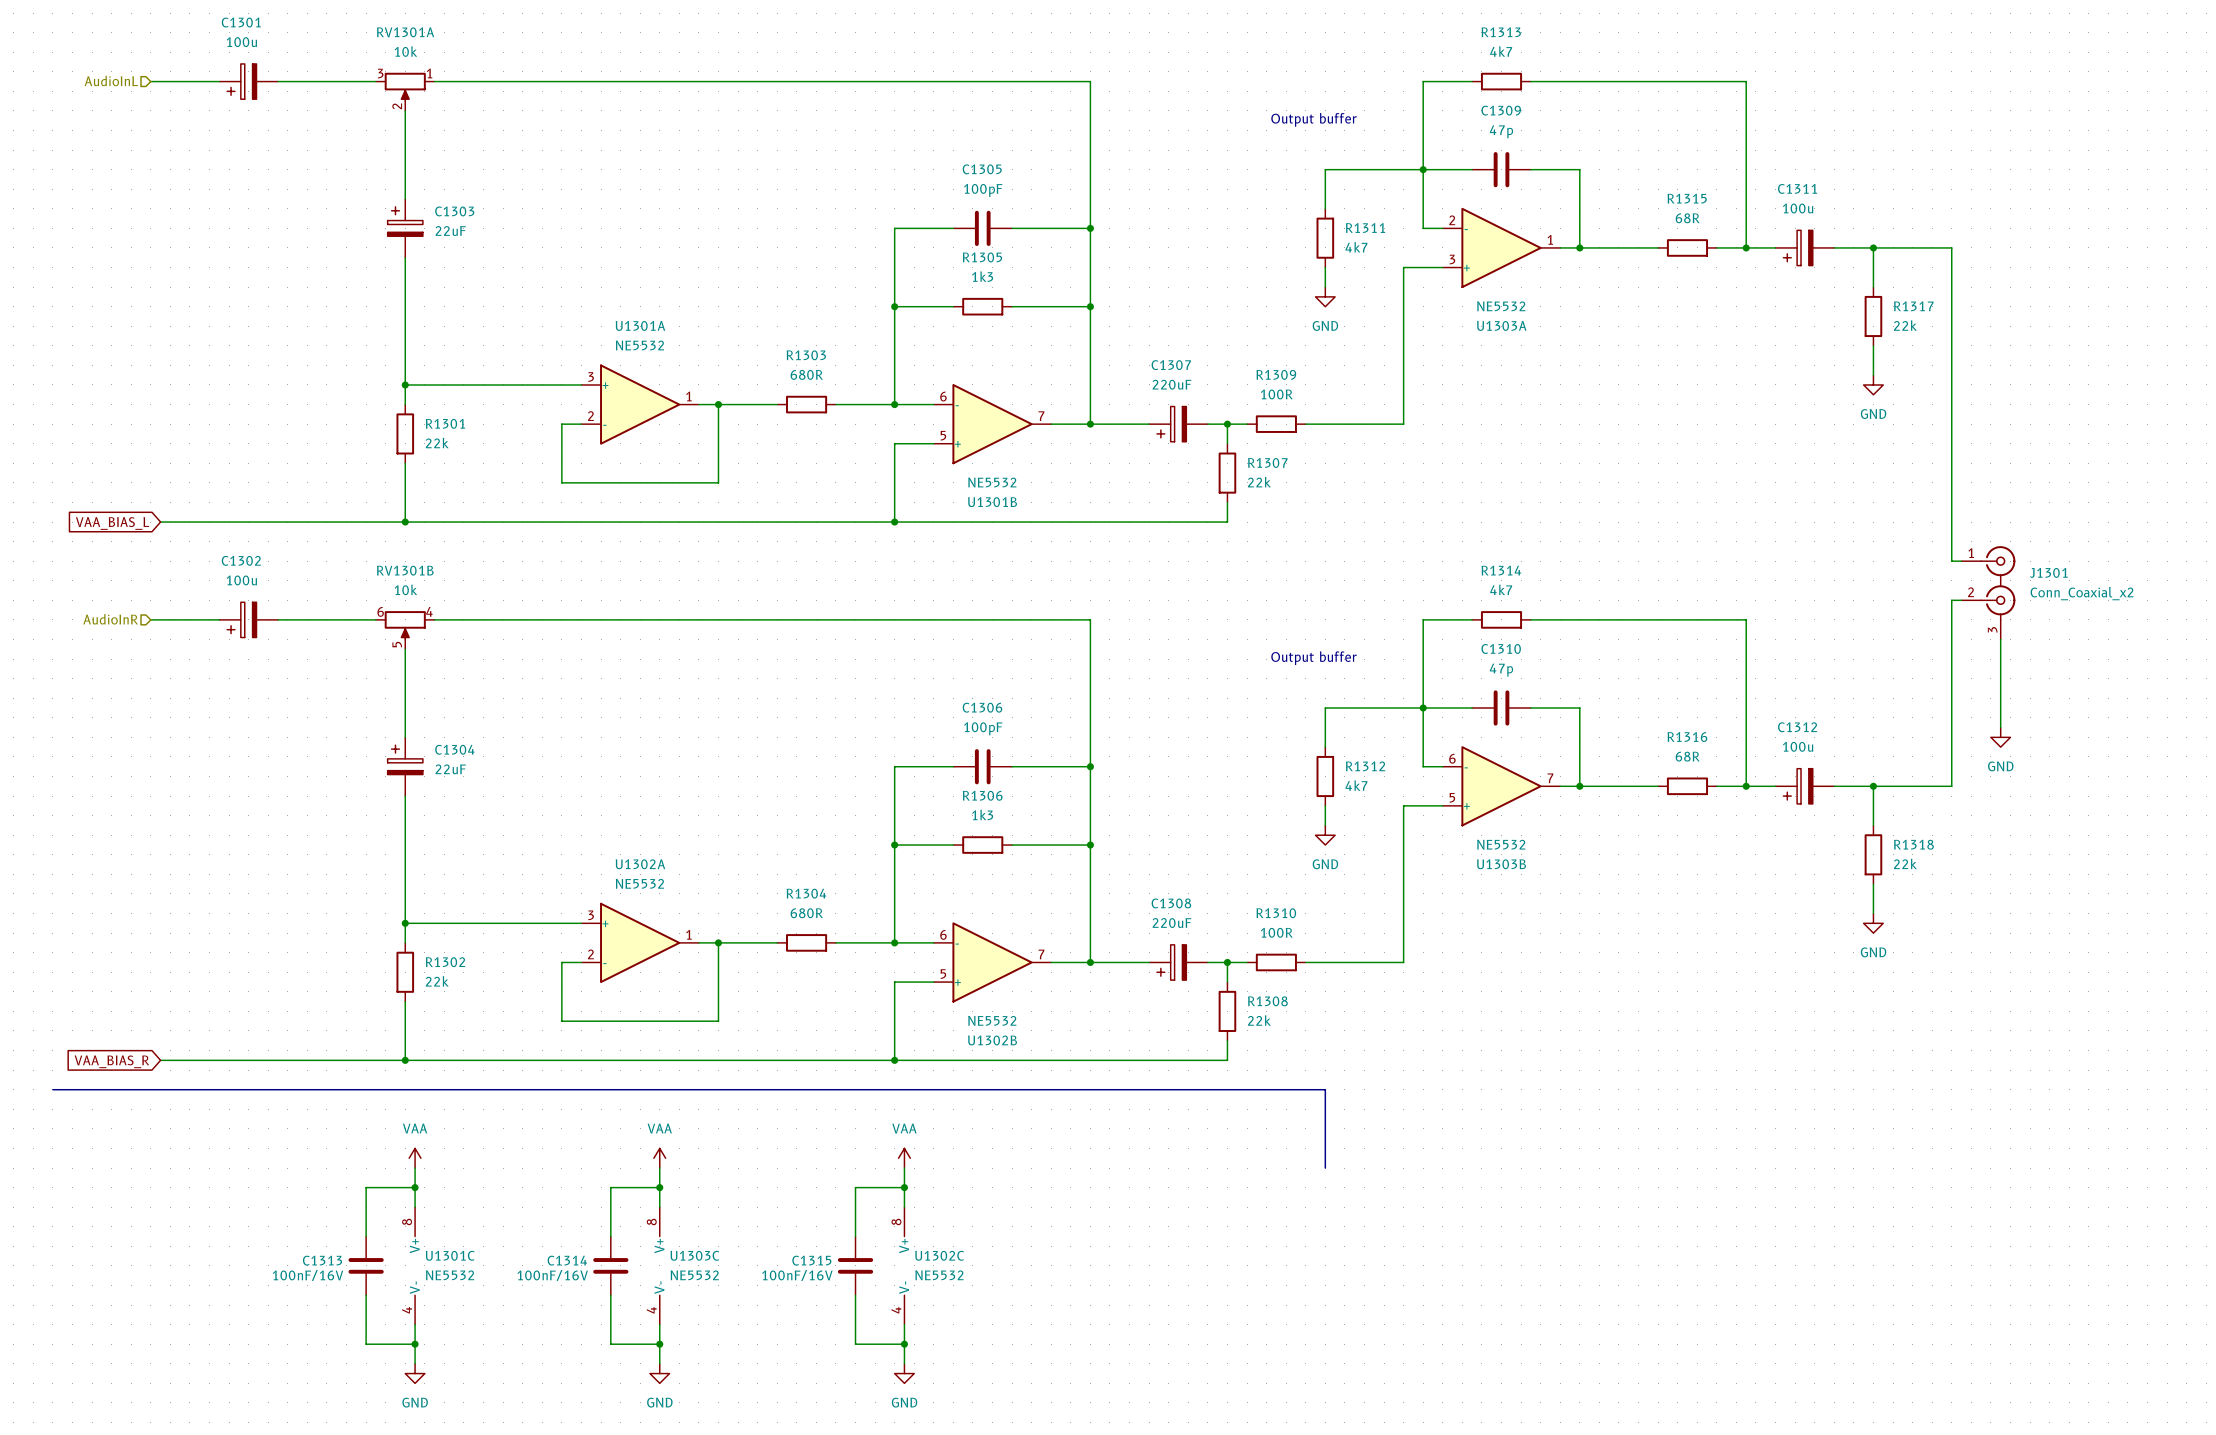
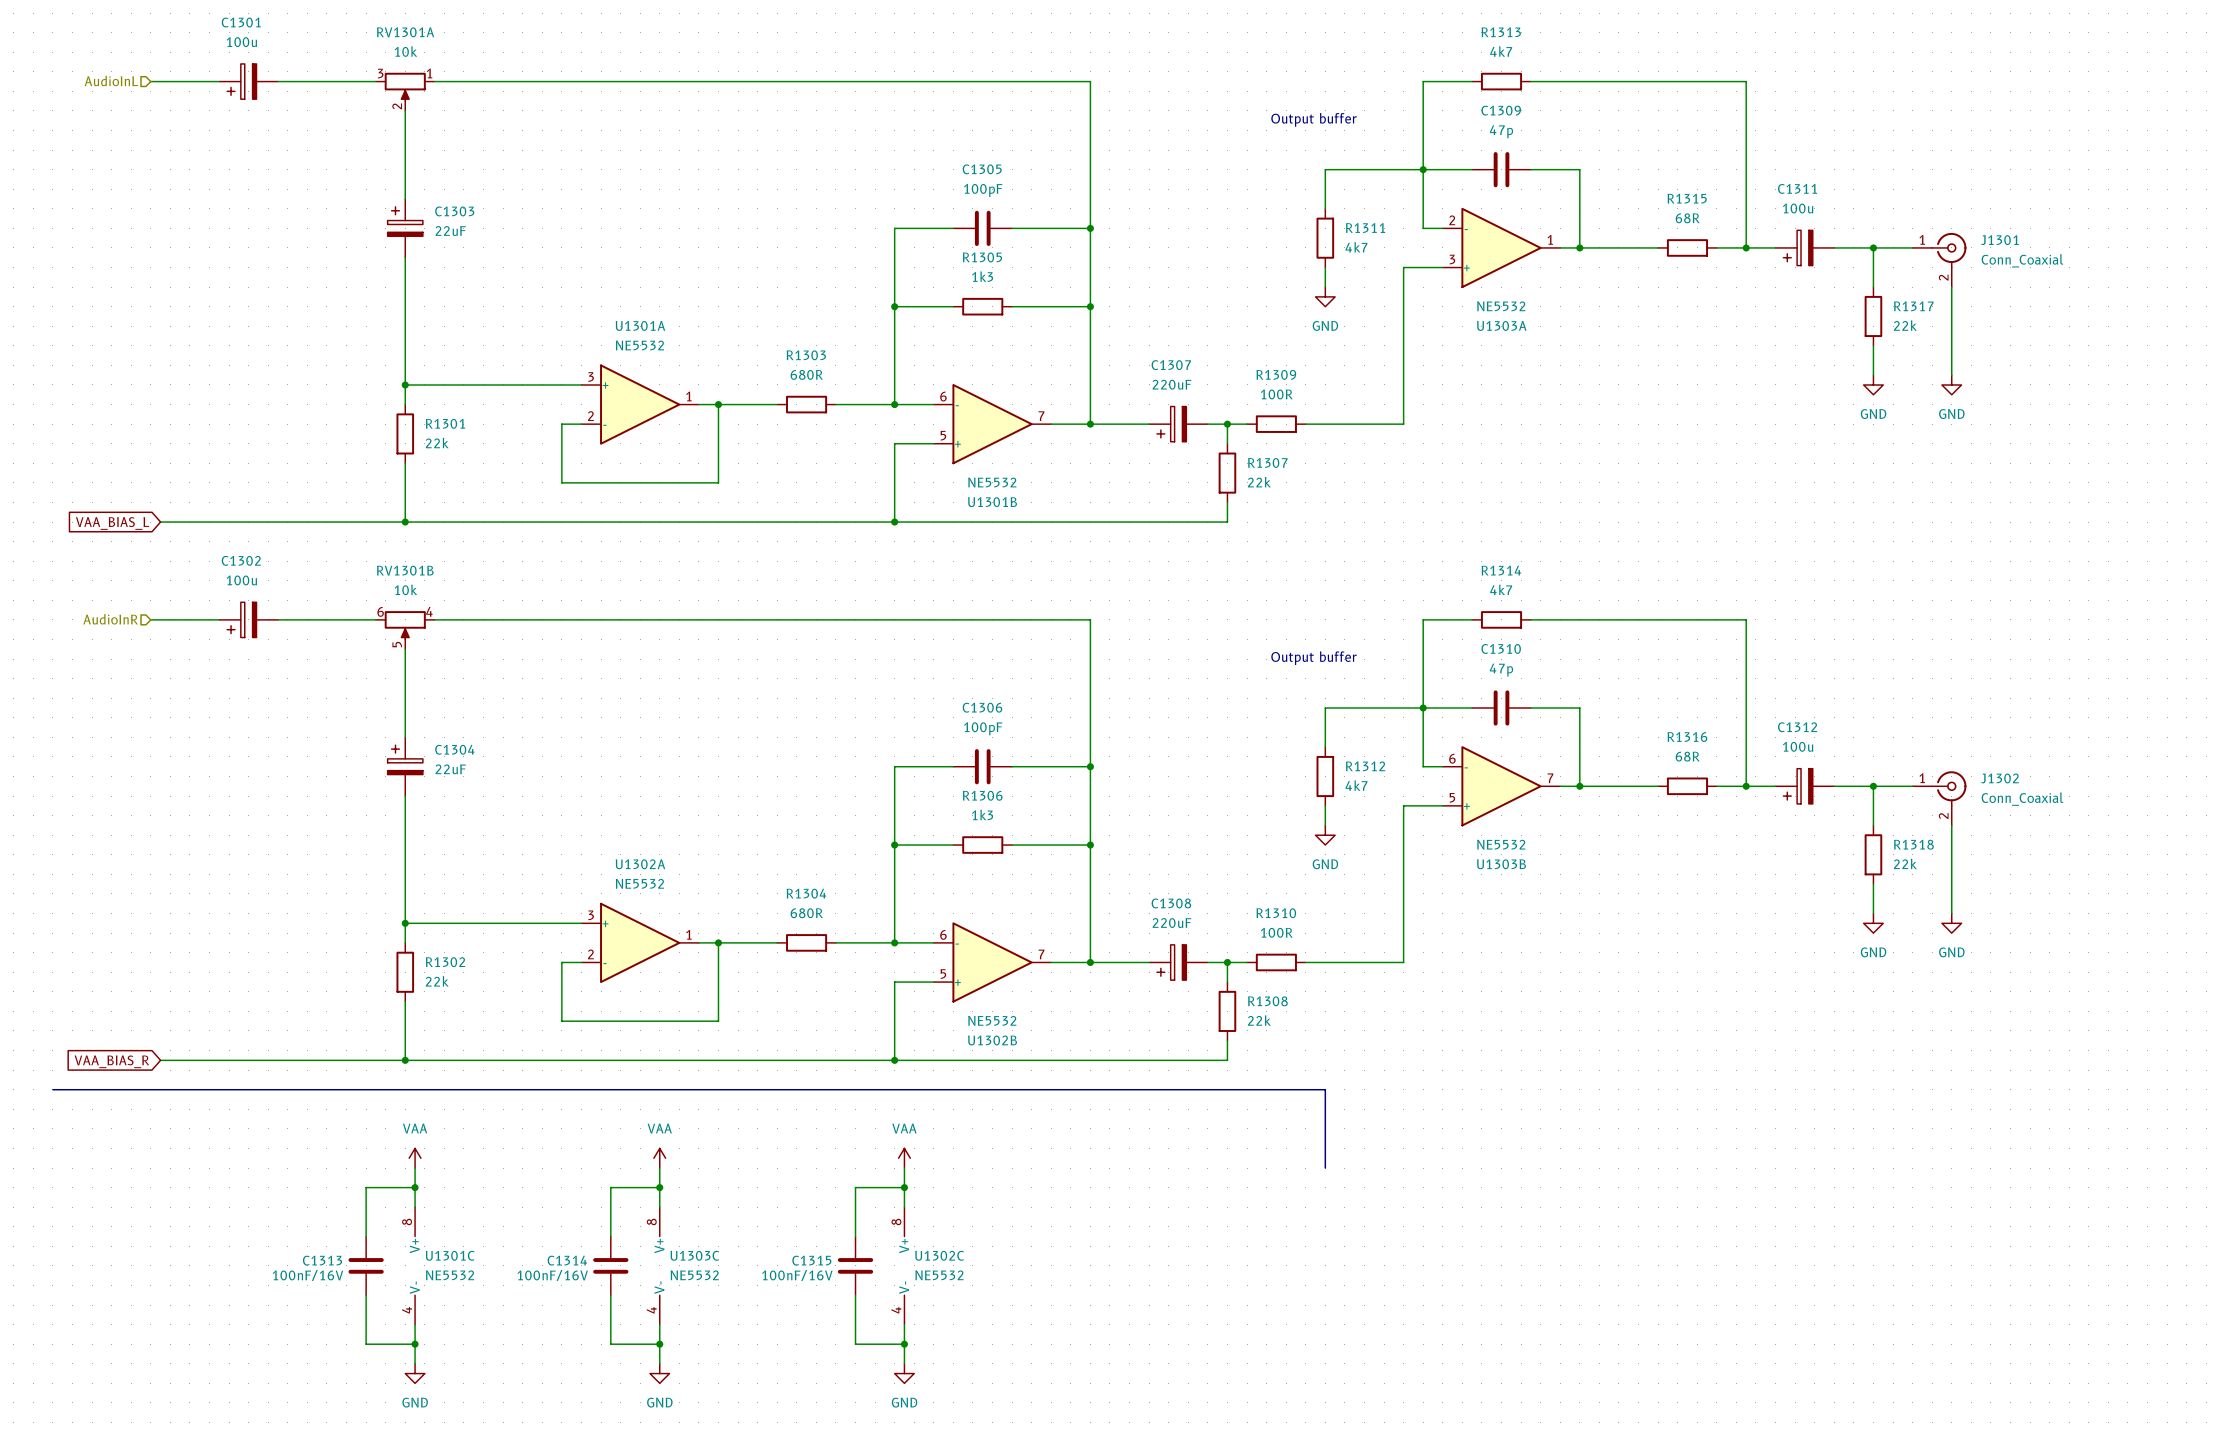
wire: (1951, 375) (1951, 561) (1961, 561) -> none
power symbol: none -> GND (1951, 384)
J1301 symbol: [1961, 546, 2016, 640] -> [1912, 232, 1967, 288]
J1301 value: Conn_Coaxial_x2 (2082, 593) -> Conn_Coaxial (2022, 260)
wire: (1961, 600) (1951, 600) (1951, 786) (1912, 786) -> none
wire: (2000, 639) (2000, 727) -> (1951, 825) (1951, 913)
power symbol: GND (2000, 737) -> none
J1302: none -> Conn_Coaxial (1939, 798)
power symbol: none -> GND (1951, 923)

